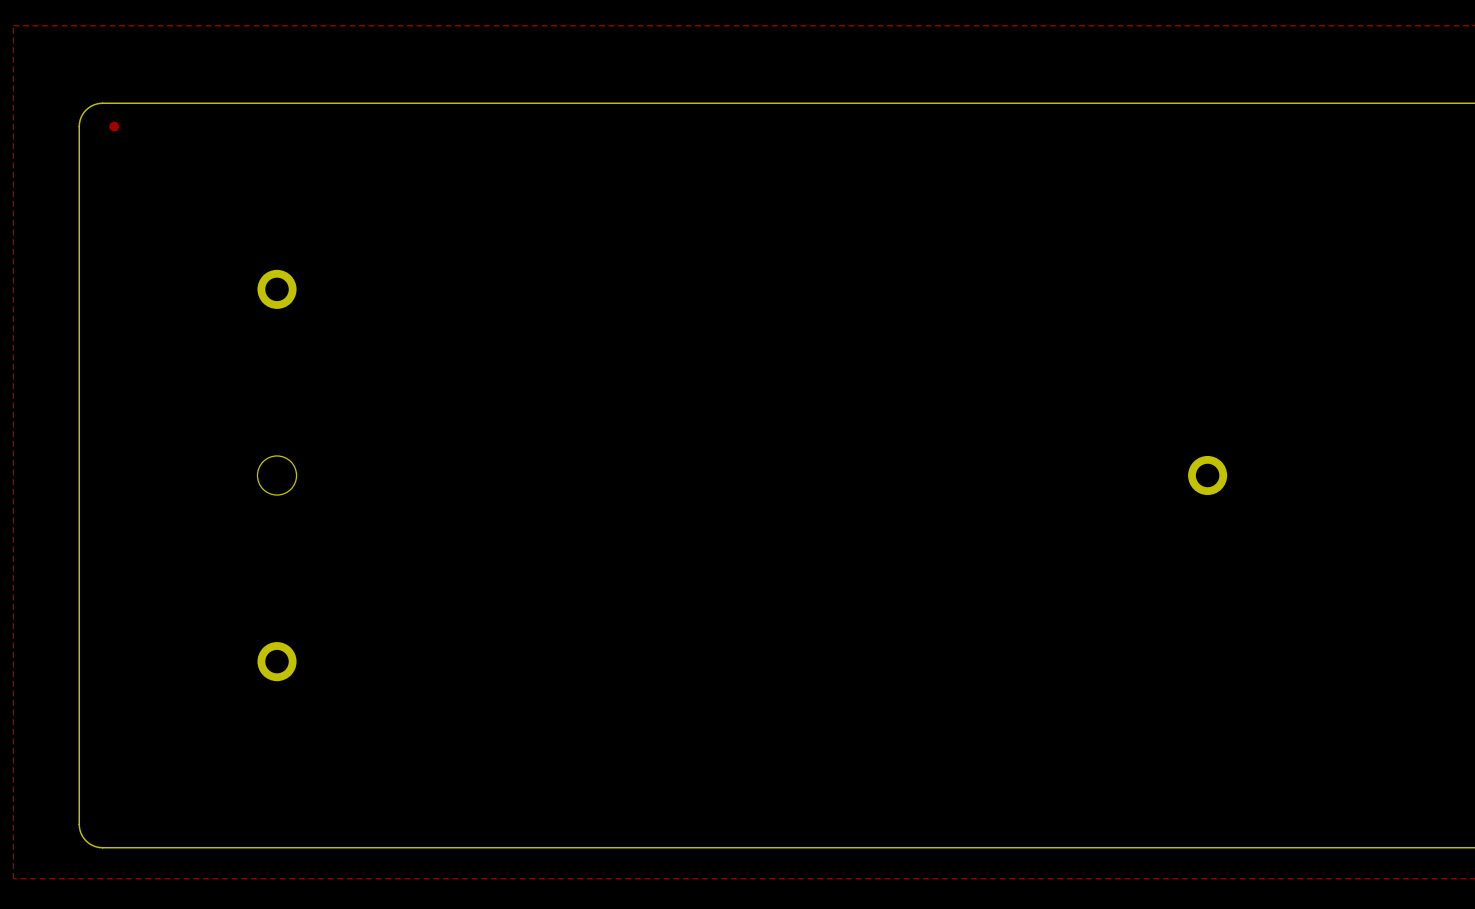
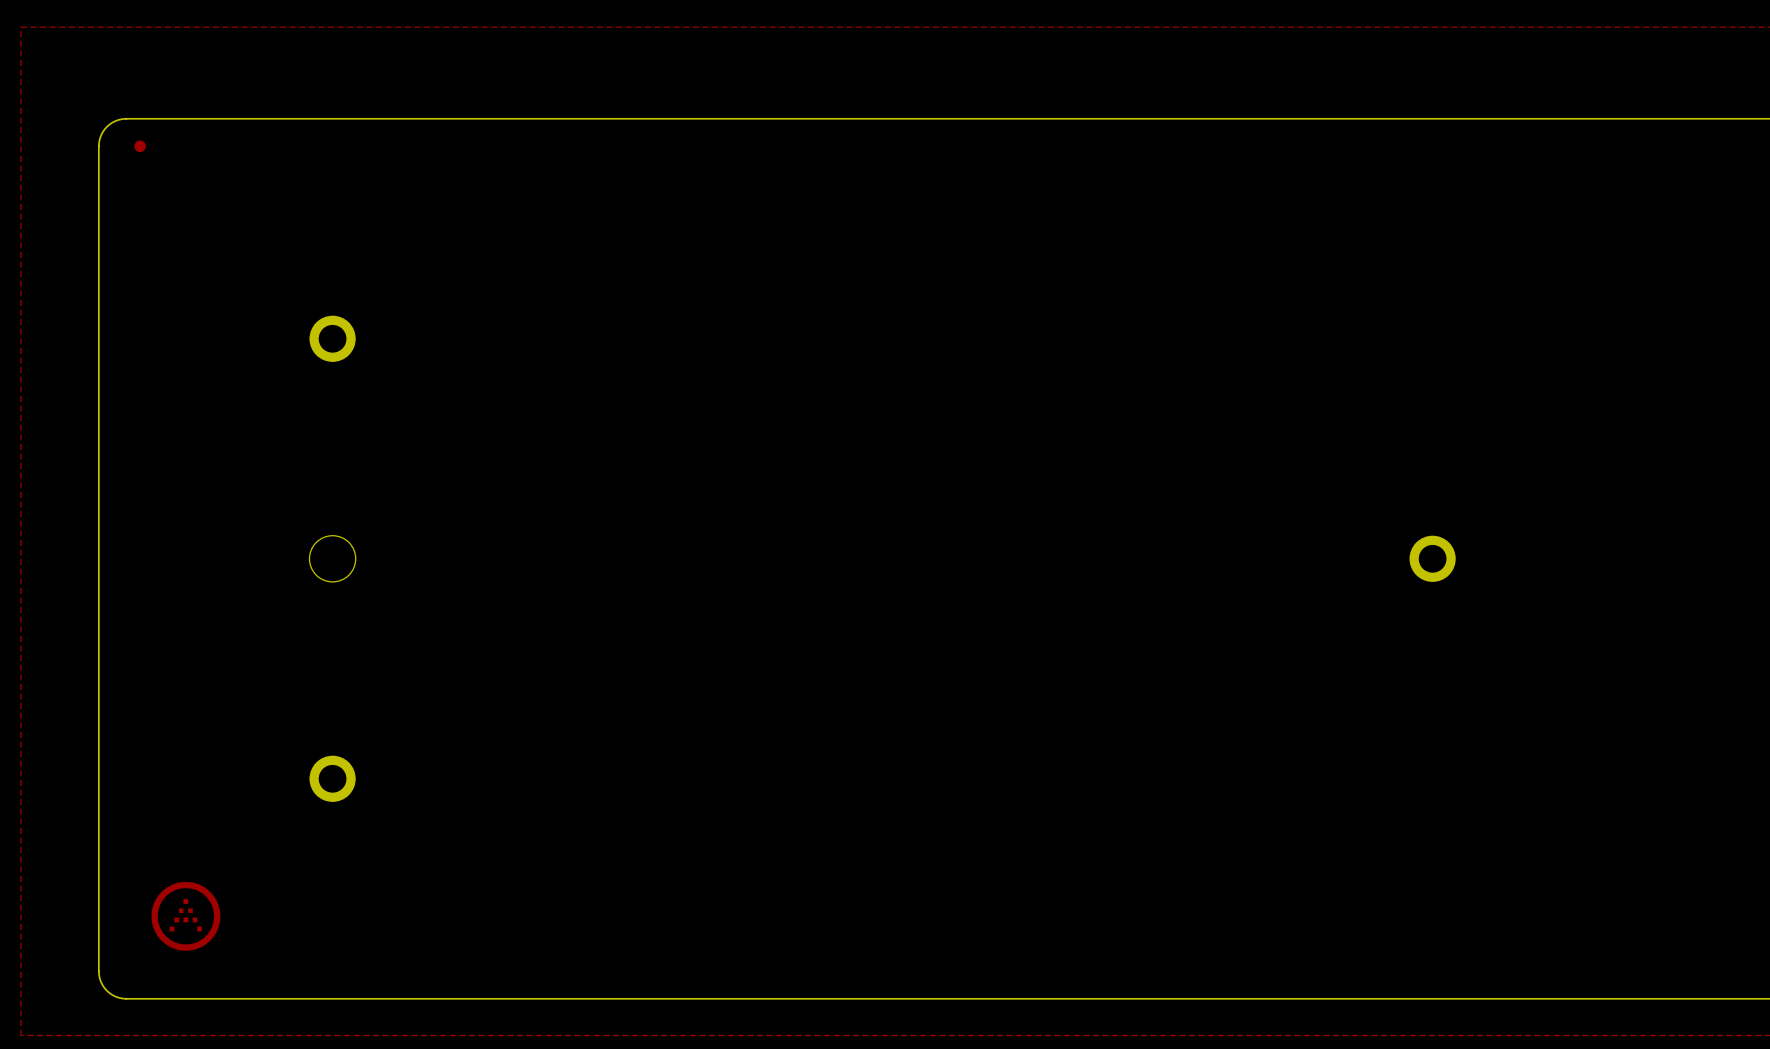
drawing: none -> [151, 881, 221, 951]

